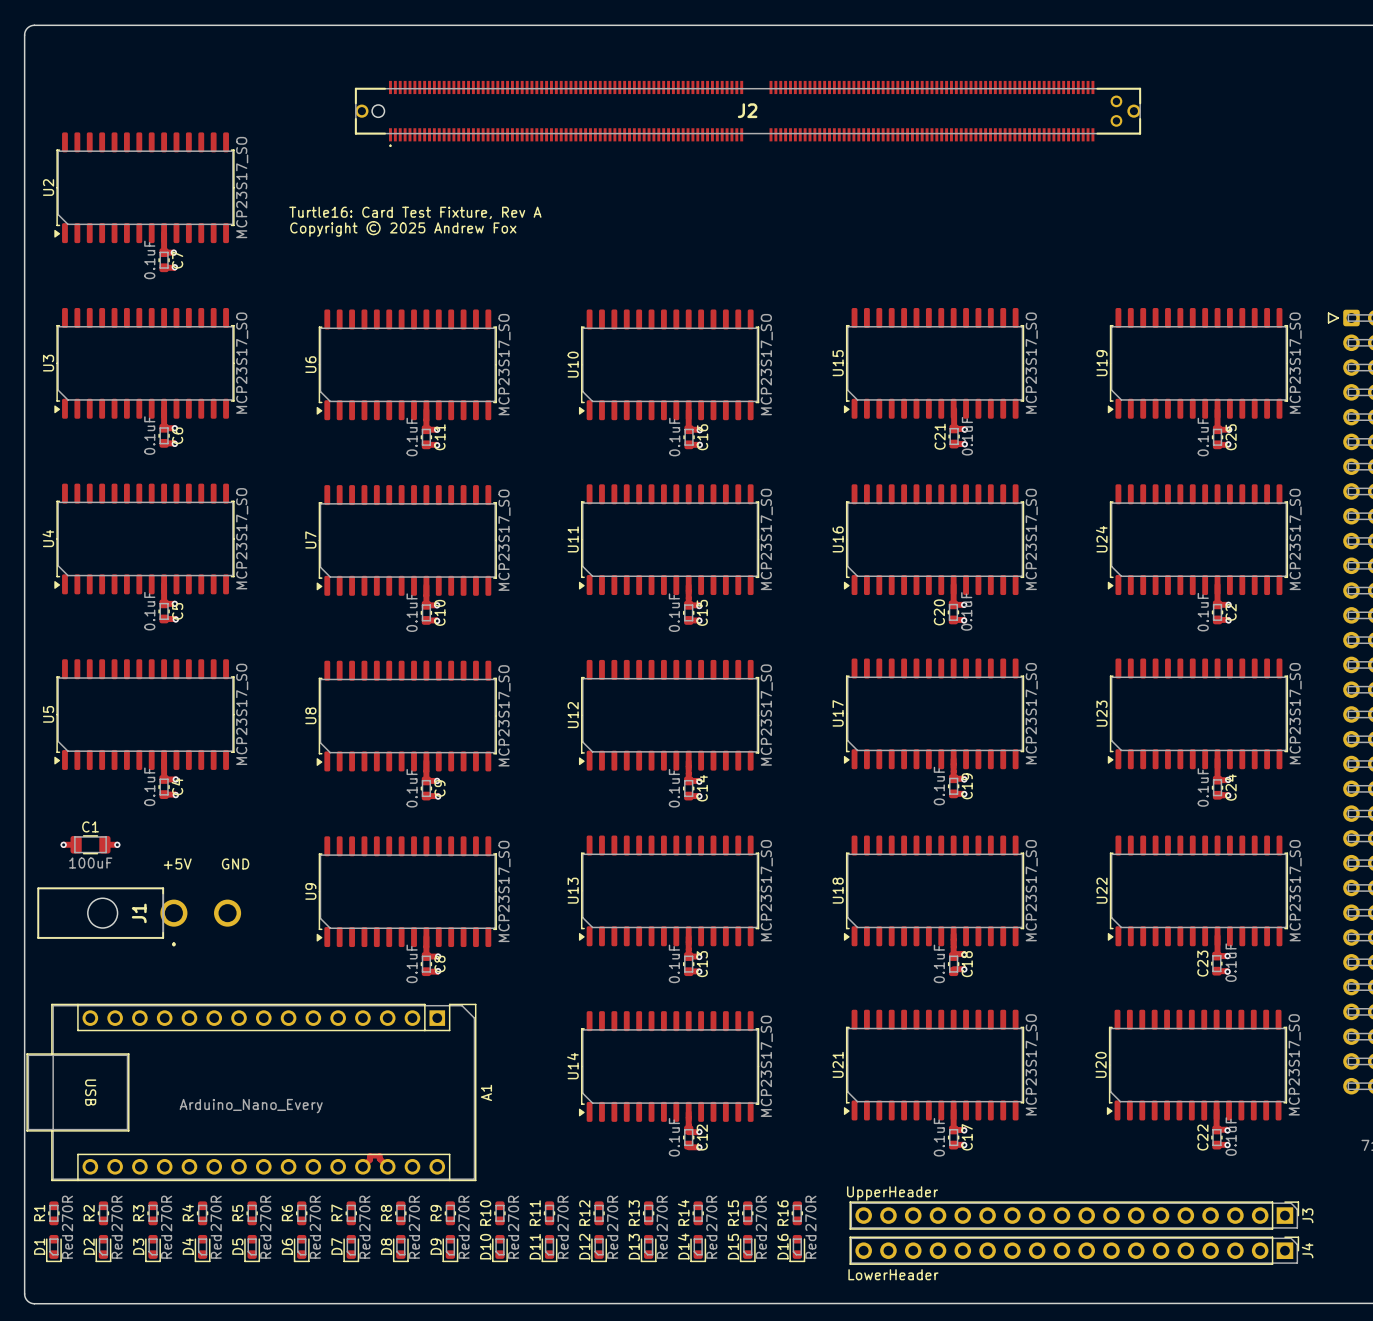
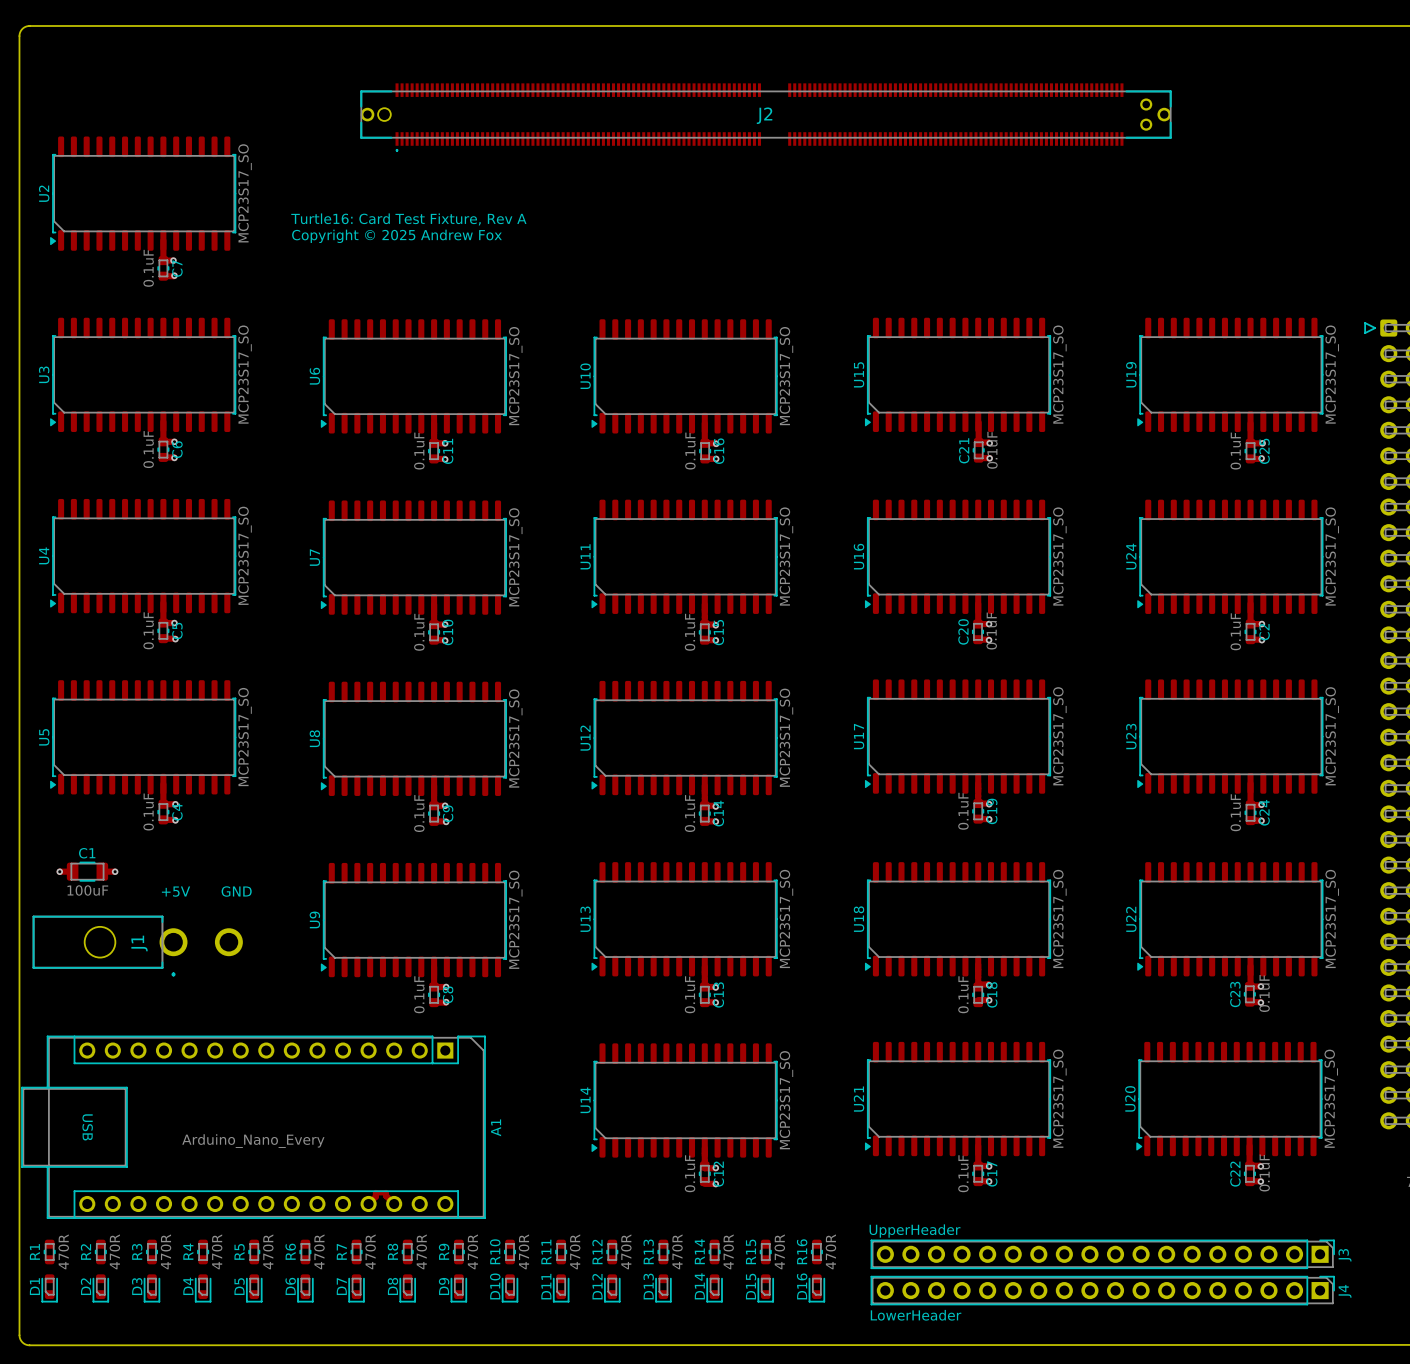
R1 value: 270R (67, 1213) -> 470R (63, 1251)
R2 value: 270R (117, 1213) -> 470R (114, 1251)
R3 value: 270R (166, 1213) -> 470R (166, 1251)
R4 value: 270R (216, 1213) -> 470R (217, 1251)
R5 value: 270R (265, 1213) -> 470R (268, 1251)
R6 value: 270R (315, 1213) -> 470R (319, 1251)
R7 value: 270R (364, 1213) -> 470R (370, 1251)
R8 value: 270R (414, 1213) -> 470R (421, 1251)
R9 value: 270R (463, 1213) -> 470R (472, 1251)
R10 value: 270R (513, 1213) -> 470R (524, 1251)
R11 value: 270R (563, 1213) -> 470R (575, 1251)
R12 value: 270R (612, 1213) -> 470R (626, 1251)
R13 value: 270R (662, 1213) -> 470R (677, 1251)
R14 value: 270R (711, 1213) -> 470R (728, 1251)
R15 value: 270R (761, 1213) -> 470R (779, 1251)
R16 value: 270R (810, 1213) -> 470R (830, 1251)
D1 value: Red (67, 1246) -> none
D2 value: Red (117, 1246) -> none
D3 value: Red (166, 1246) -> none
D4 value: Red (216, 1246) -> none
D5 value: Red (265, 1246) -> none
D6 value: Red (315, 1246) -> none
D7 value: Red (364, 1246) -> none
D8 value: Red (414, 1246) -> none
D9 value: Red (463, 1246) -> none
D10 value: Red (513, 1246) -> none
D11 value: Red (563, 1246) -> none
D12 value: Red (612, 1246) -> none
D13 value: Red (662, 1246) -> none
D14 value: Red (711, 1246) -> none
D15 value: Red (761, 1246) -> none
D16 value: Red (810, 1246) -> none

